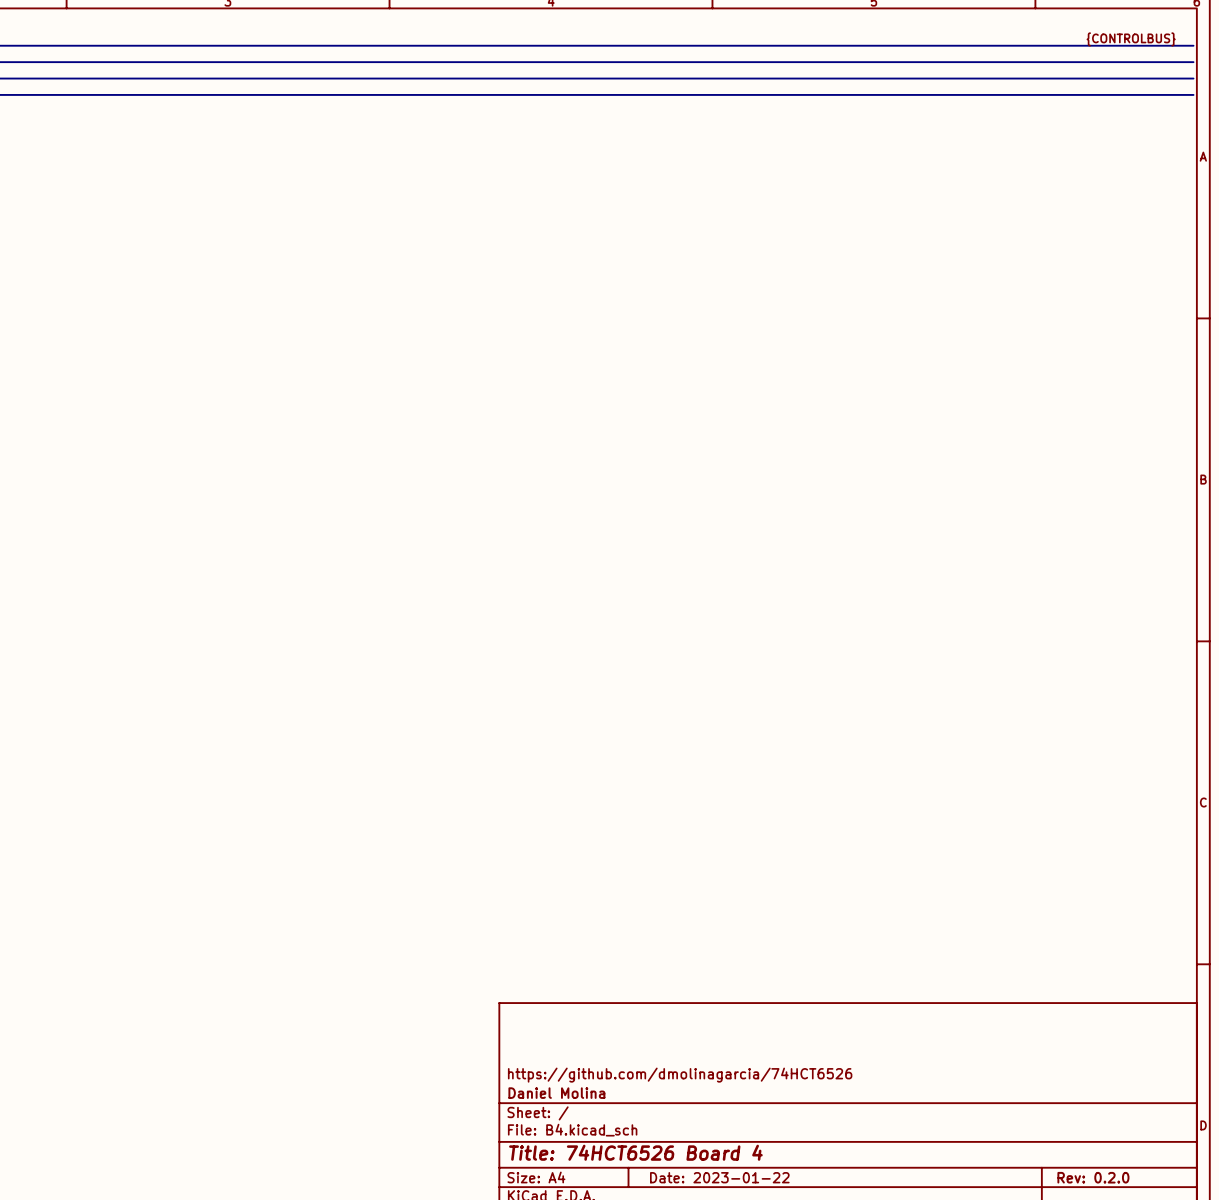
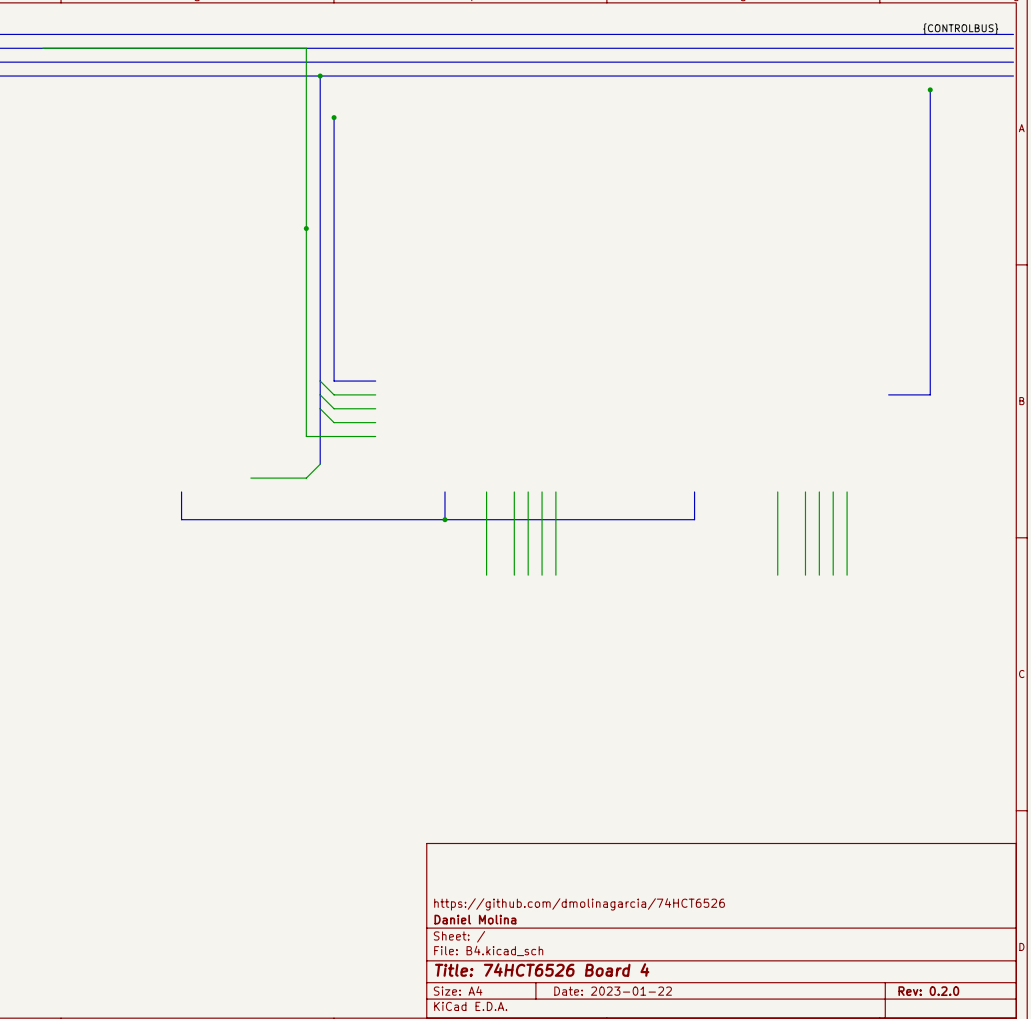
wire: none -> (42, 48) (306, 48) (306, 436) (375, 436)
bus: none -> (320, 76) (320, 464)
junction: none -> (320, 76)
bus: none -> (930, 89) (930, 394) (888, 394)
junction: none -> (930, 89)
bus: none -> (334, 117) (334, 381) (375, 381)
junction: none -> (334, 117)
junction: none -> (306, 228)
wire: none -> (320, 381) (334, 394) (375, 394)
wire: none -> (320, 394) (334, 408) (375, 408)
wire: none -> (320, 408) (334, 422) (375, 422)
wire: none -> (320, 464) (306, 478) (250, 478)
bus: none -> (181, 491) (181, 519) (694, 519) (694, 491)
bus: none -> (444, 491) (444, 519)
wire: none -> (486, 491) (486, 575)
wire: none -> (514, 491) (514, 575)
wire: none -> (528, 491) (528, 575)
wire: none -> (542, 491) (542, 575)
wire: none -> (555, 491) (555, 575)
wire: none -> (777, 491) (777, 575)
wire: none -> (805, 491) (805, 575)
wire: none -> (819, 491) (819, 575)
wire: none -> (833, 491) (833, 575)
wire: none -> (847, 491) (847, 575)
junction: none -> (444, 519)

